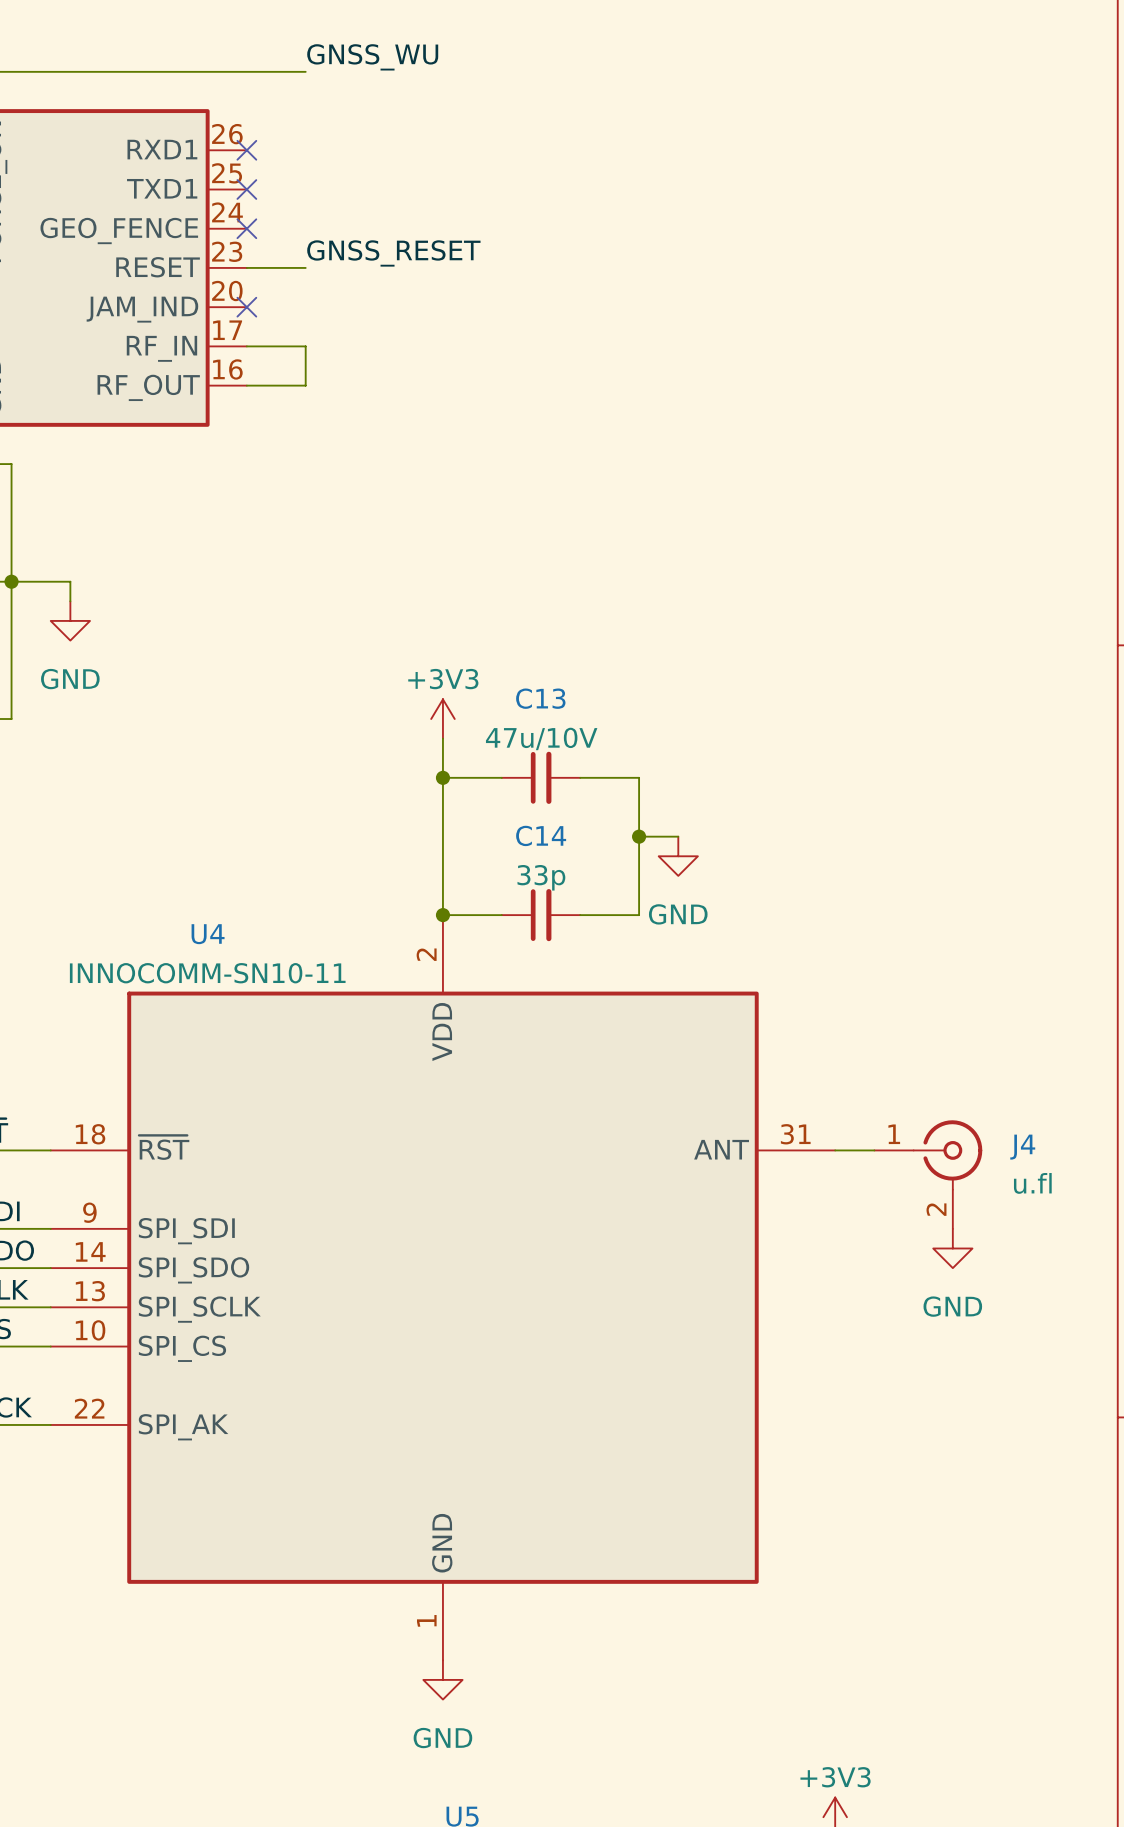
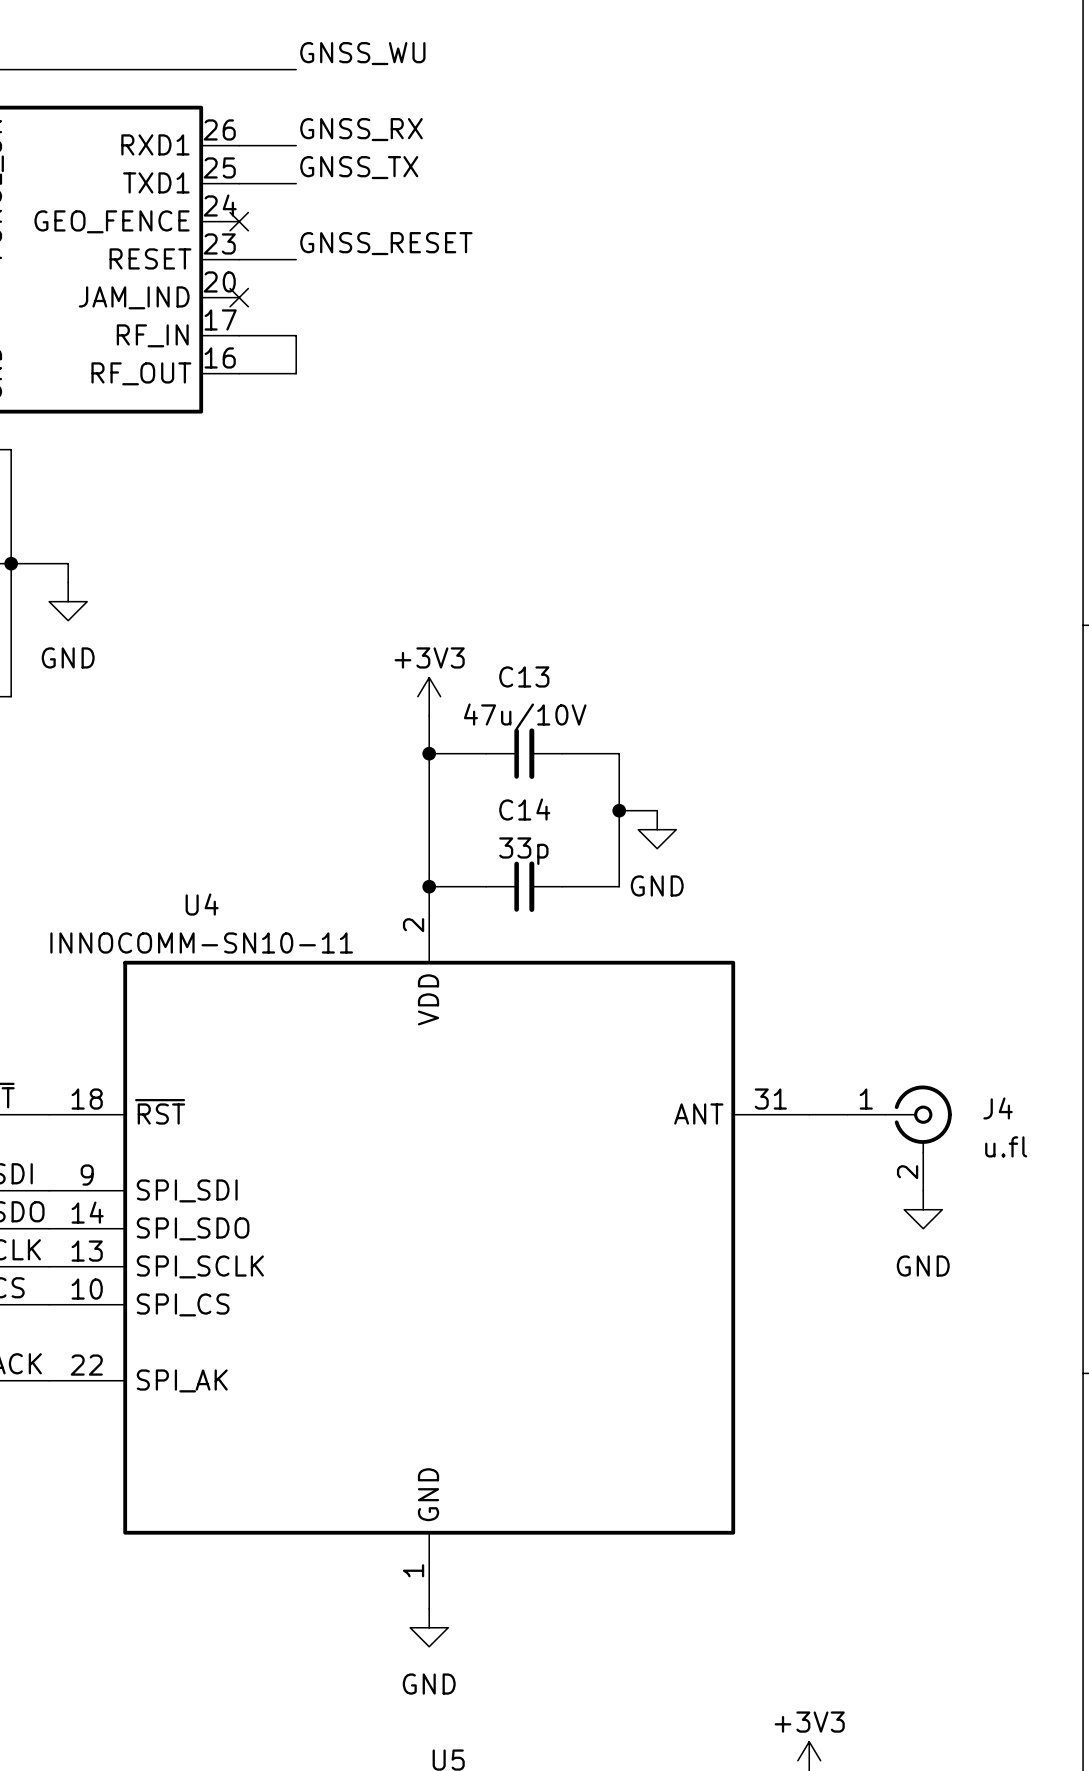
label: none -> GNSS_RX (361, 129)
wire: none -> (239, 145) (296, 145)
no-connect mark: (246, 150) -> none
label: none -> GNSS_TX (359, 167)
wire: none -> (239, 183) (296, 183)
no-connect mark: (246, 189) -> none

